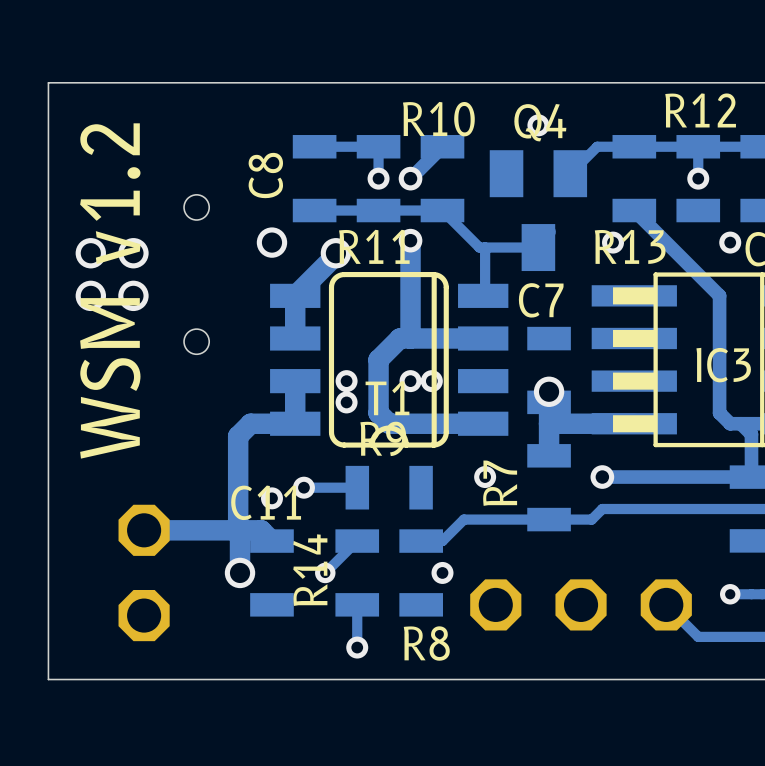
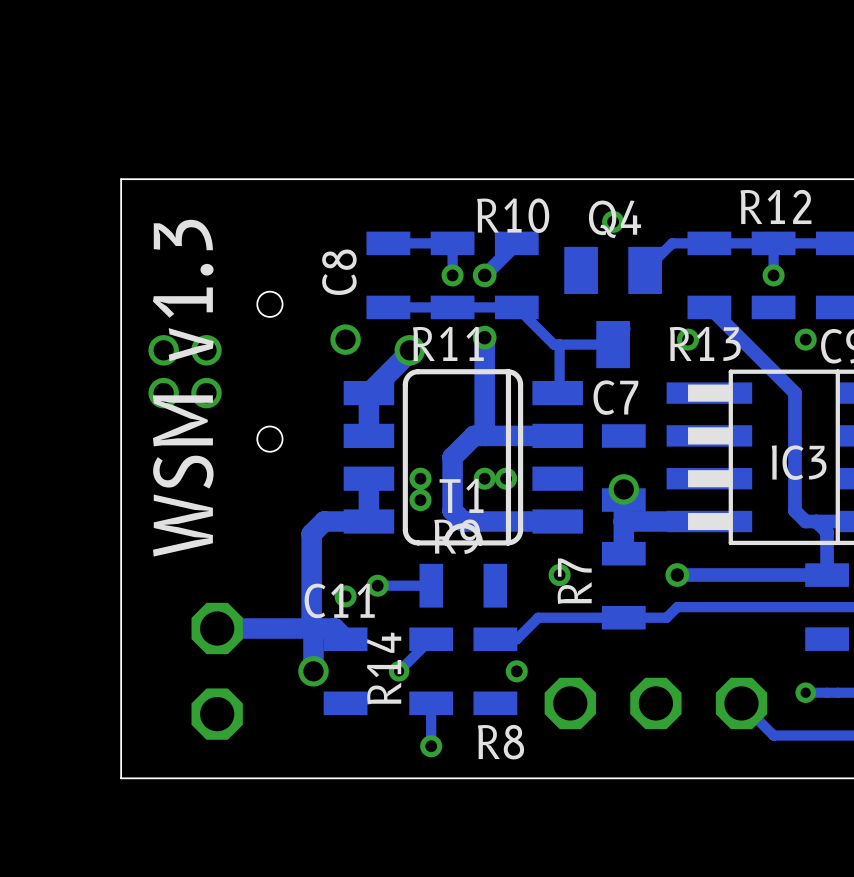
text: WSM v1.2 (110, 290) -> WSM v1.3 (183, 388)

